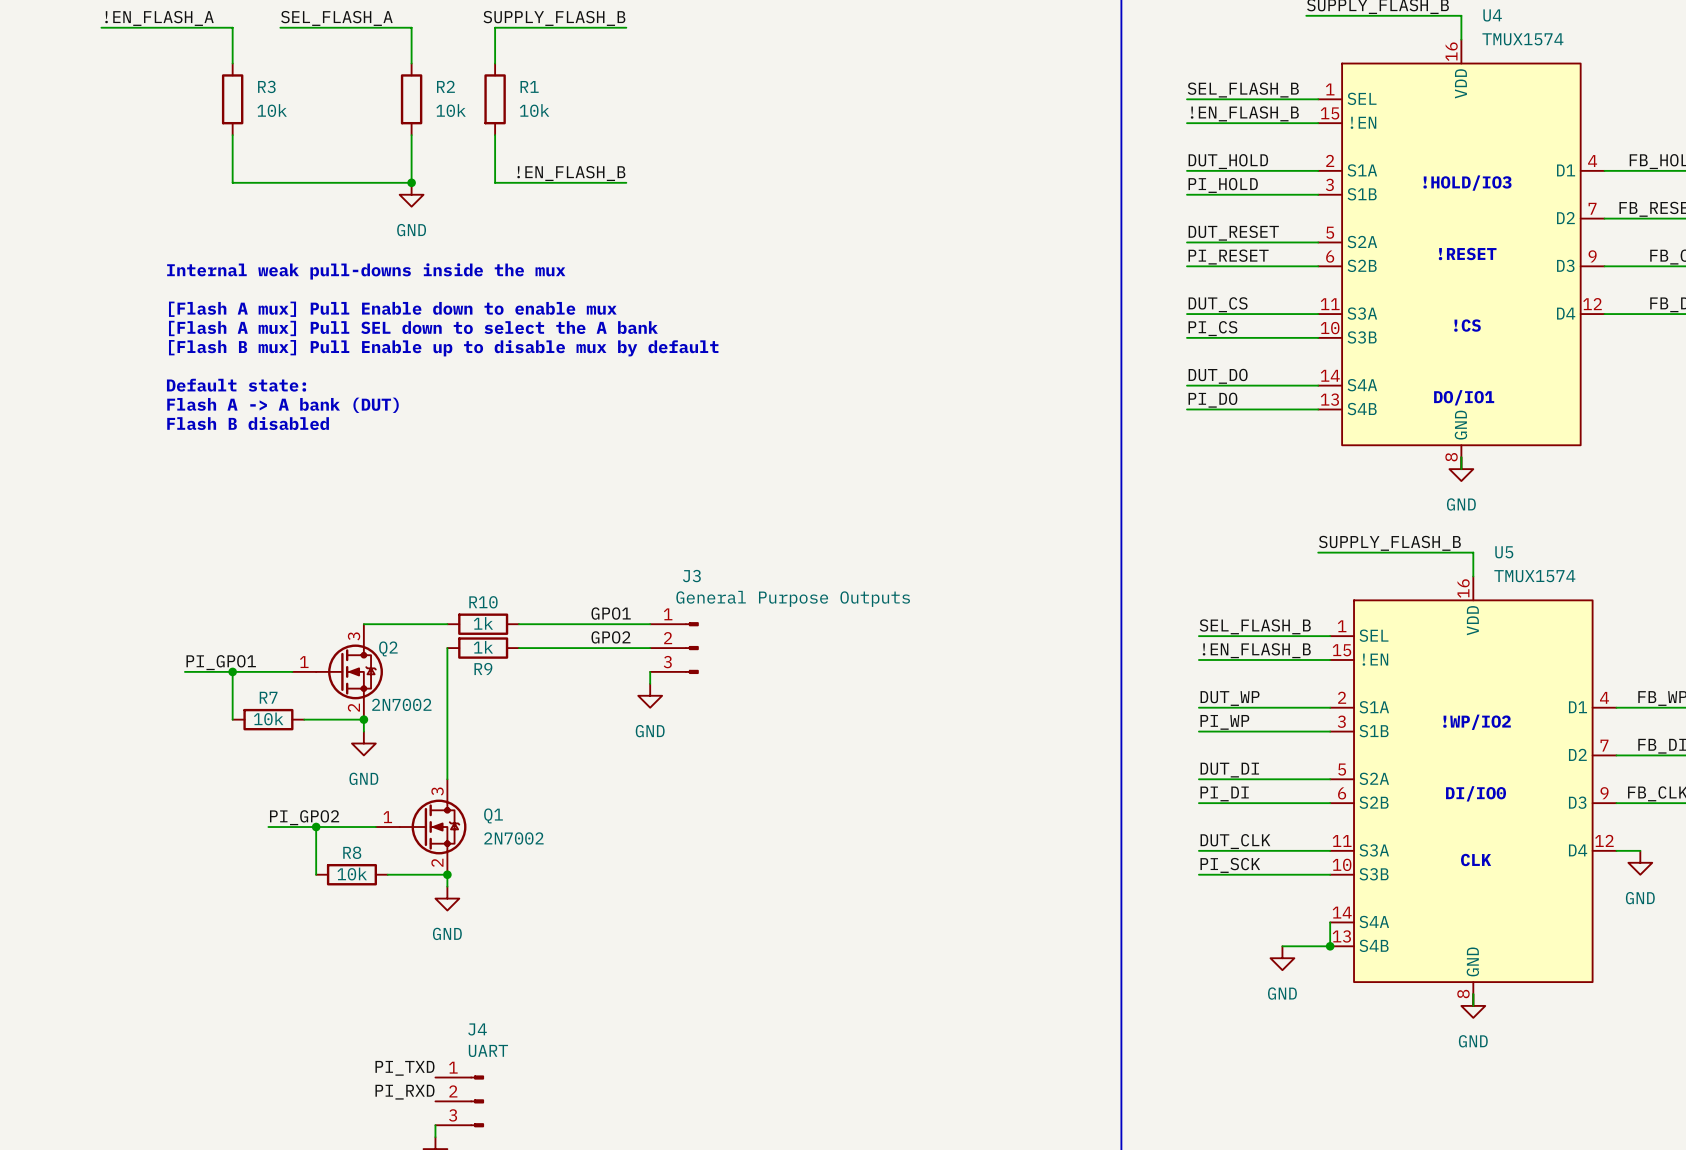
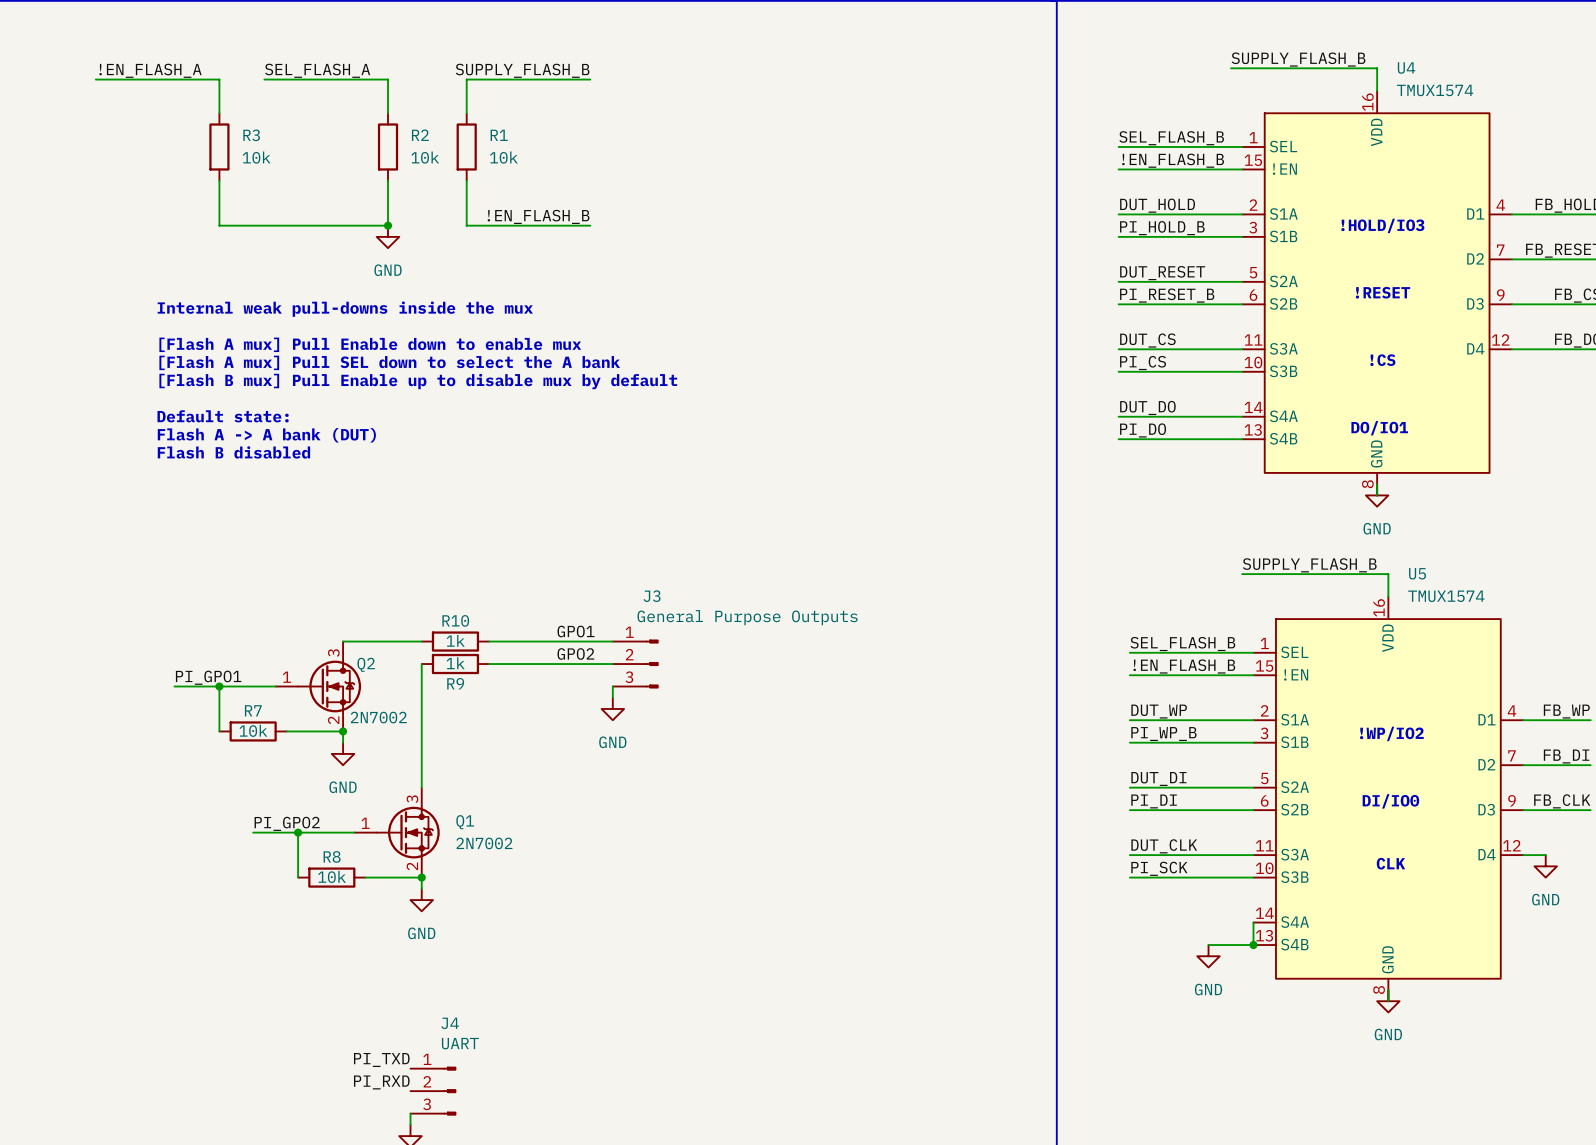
label: PI_HOLD (1223, 185) -> PI_HOLD_B (1162, 228)
label: PI_RESET (1228, 257) -> PI_RESET_B (1167, 295)
label: PI_WP (1224, 722) -> PI_WP_B (1163, 734)

